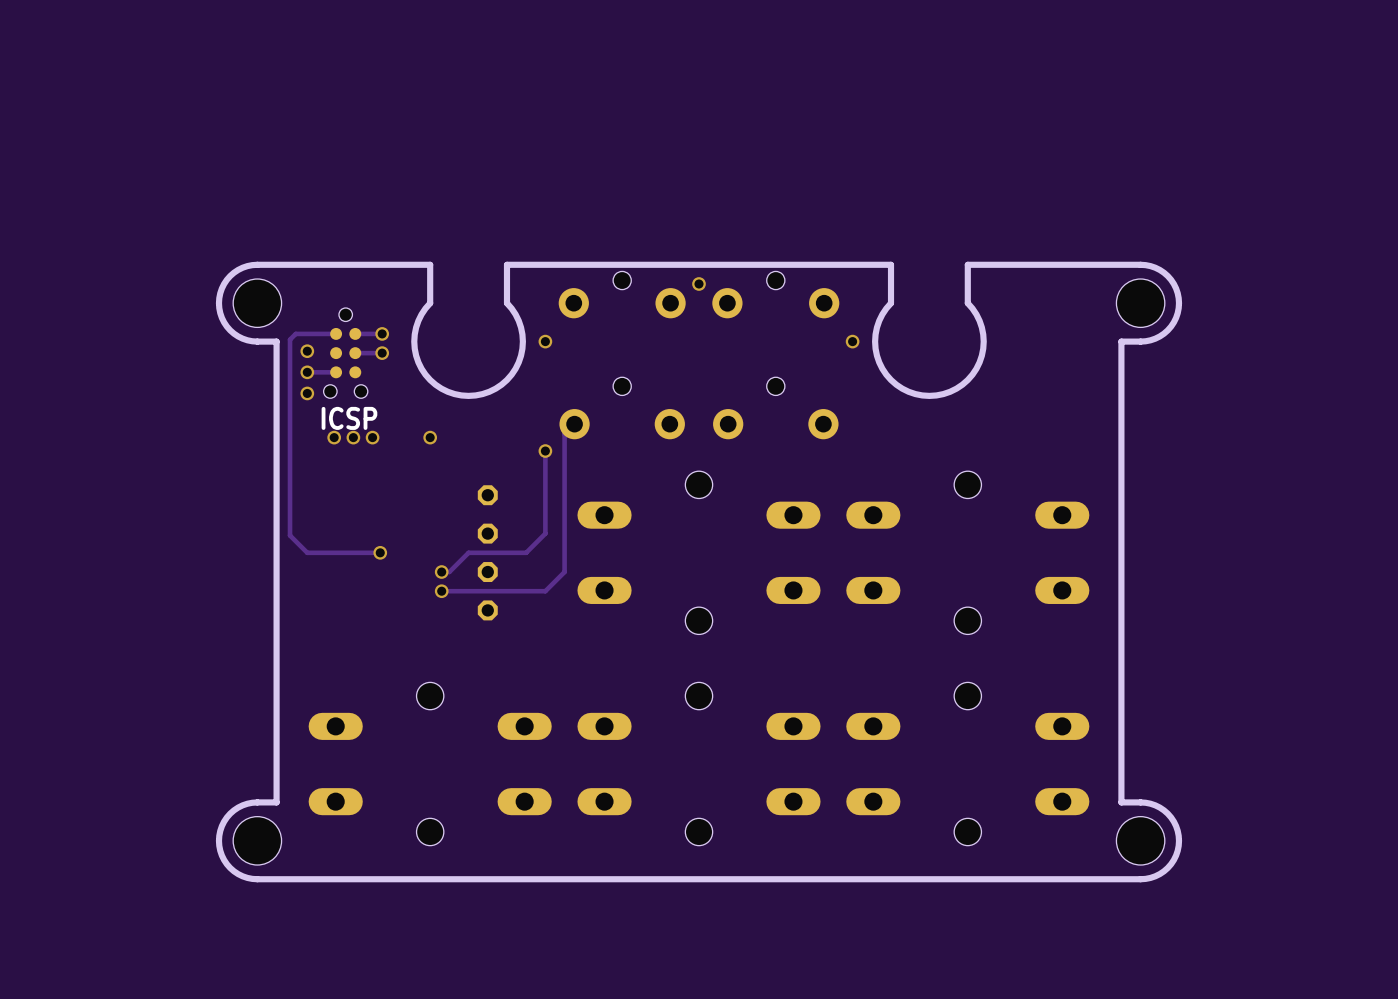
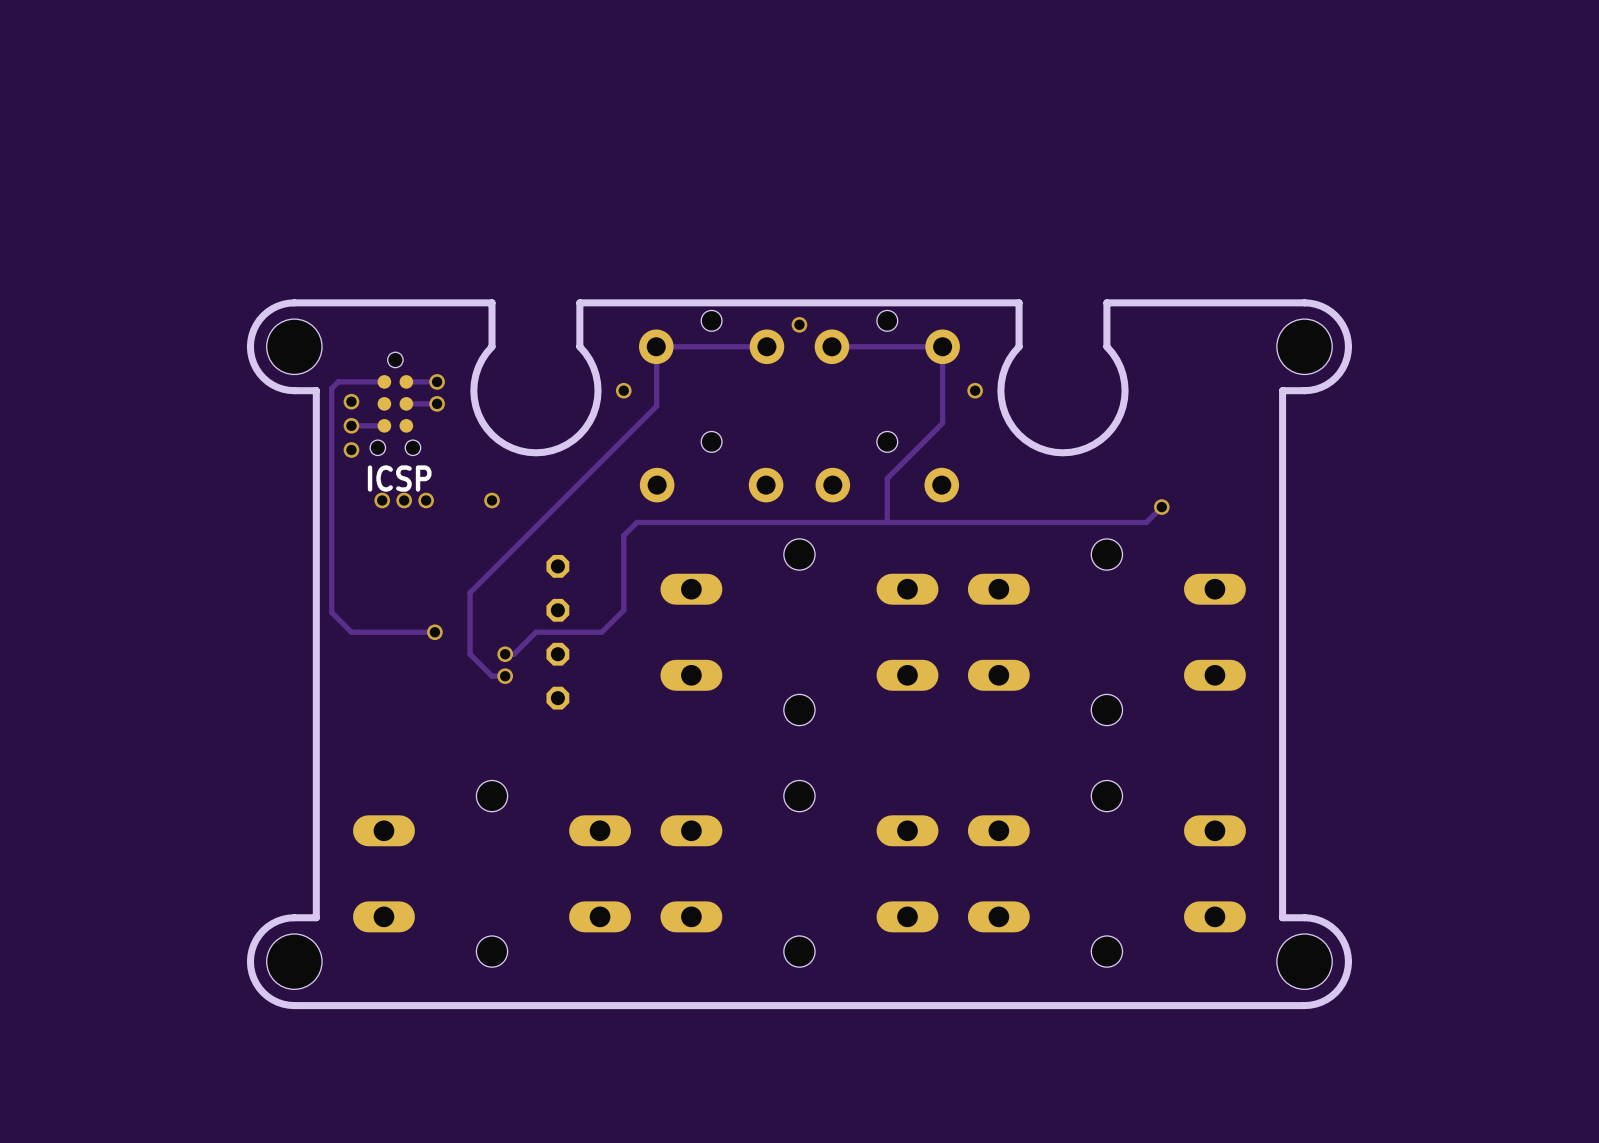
track: none -> (942, 346) (831, 346)
track: none -> (942, 346) (942, 423) (887, 478) (887, 522)
track: (574, 424) (564, 434) (564, 572) (545, 591) (441, 591) -> (766, 346) (656, 346) (656, 406) (470, 592) (470, 654) (492, 676) (505, 676)
via: none -> (1161, 507)
track: (545, 451) (545, 468) -> (1161, 507) (1146, 522) (636, 522) (623, 535)
via: (545, 451) -> none

